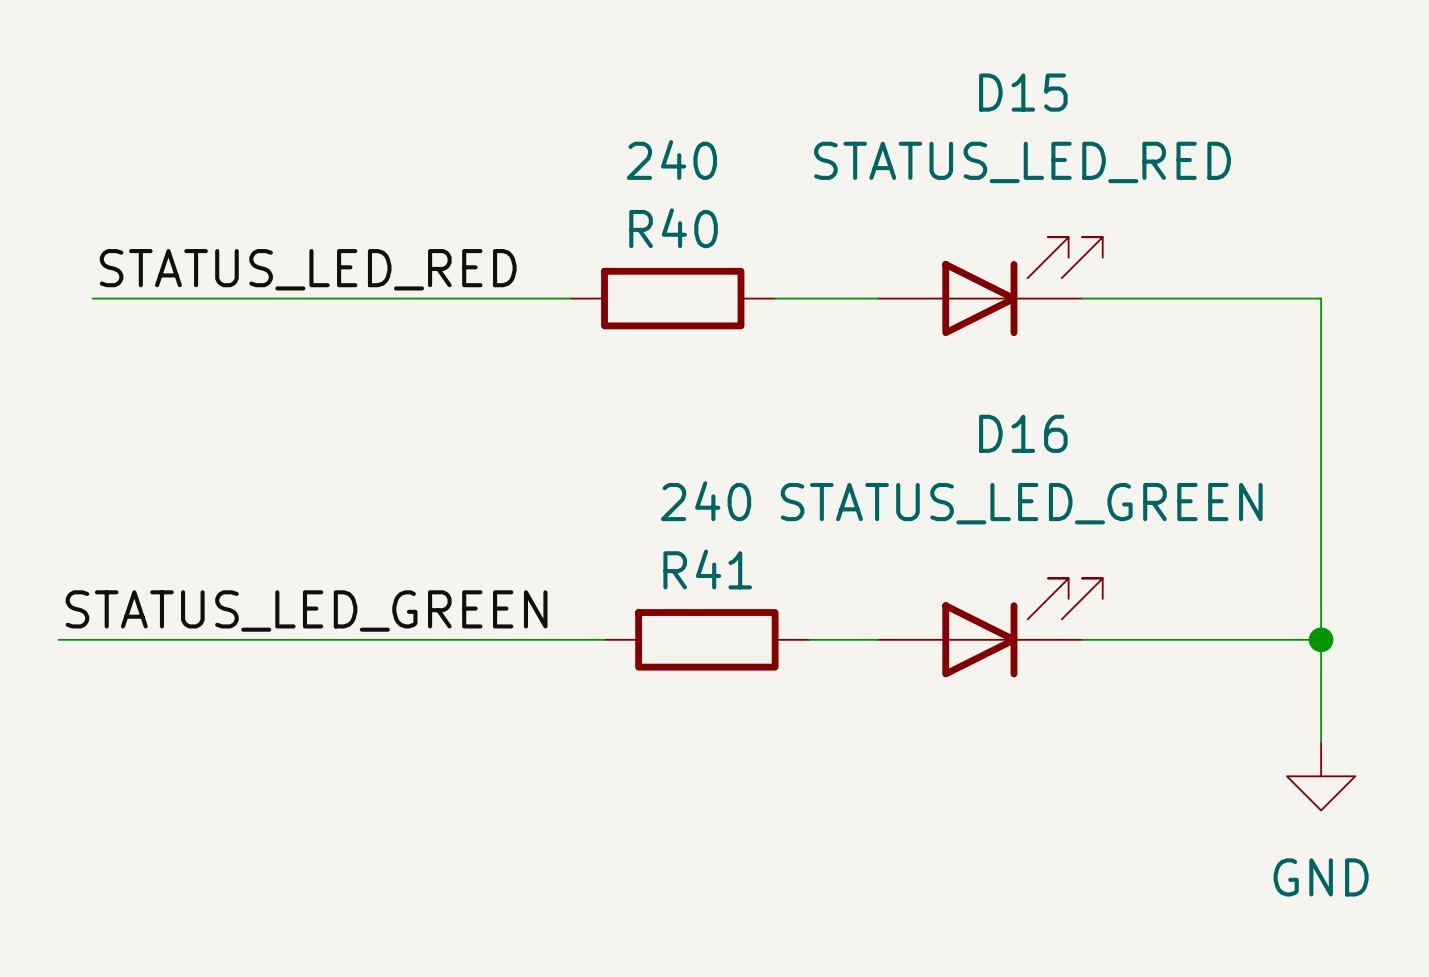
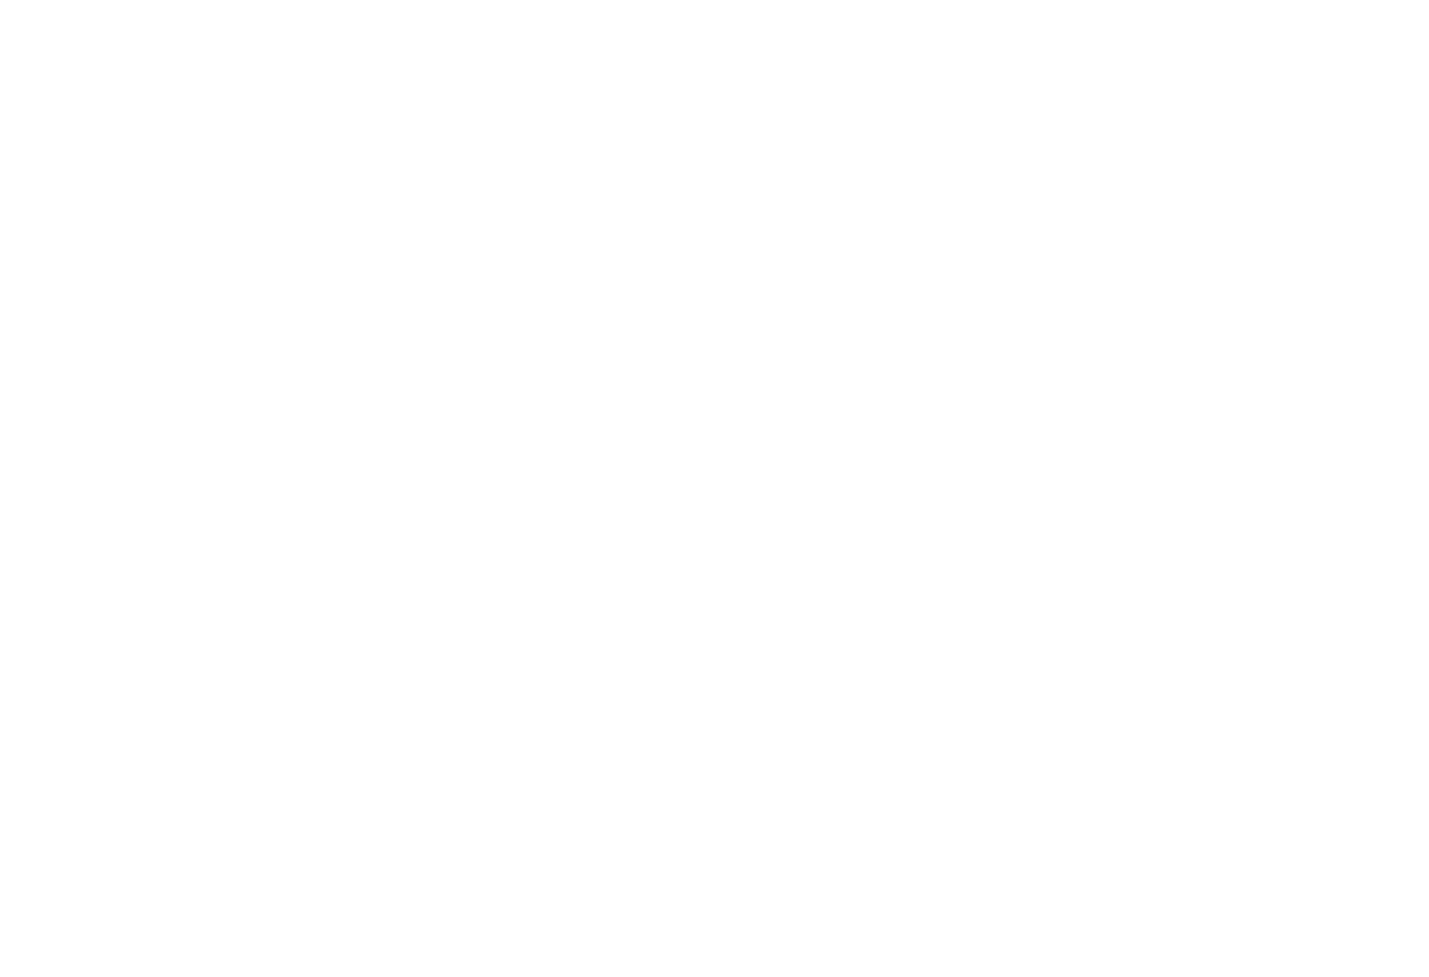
label: STATUS_LED_RED (308, 269) -> none
D15: STATUS_LED_RED (990, 286) -> none
wire: (92, 298) (570, 298) -> none
R40: 240 (672, 298) -> none
wire: (775, 298) (877, 298) -> none
wire: (1082, 298) (1321, 298) (1321, 742) -> none
label: STATUS_LED_GREEN (306, 611) -> none
D16: STATUS_LED_GREEN (990, 627) -> none
wire: (58, 639) (604, 639) -> none
R41: 240 (706, 639) -> none
wire: (809, 639) (877, 639) -> none
wire: (1082, 639) (1321, 639) -> none
junction: (1321, 639) -> none
power symbol: GND (1321, 776) -> none

